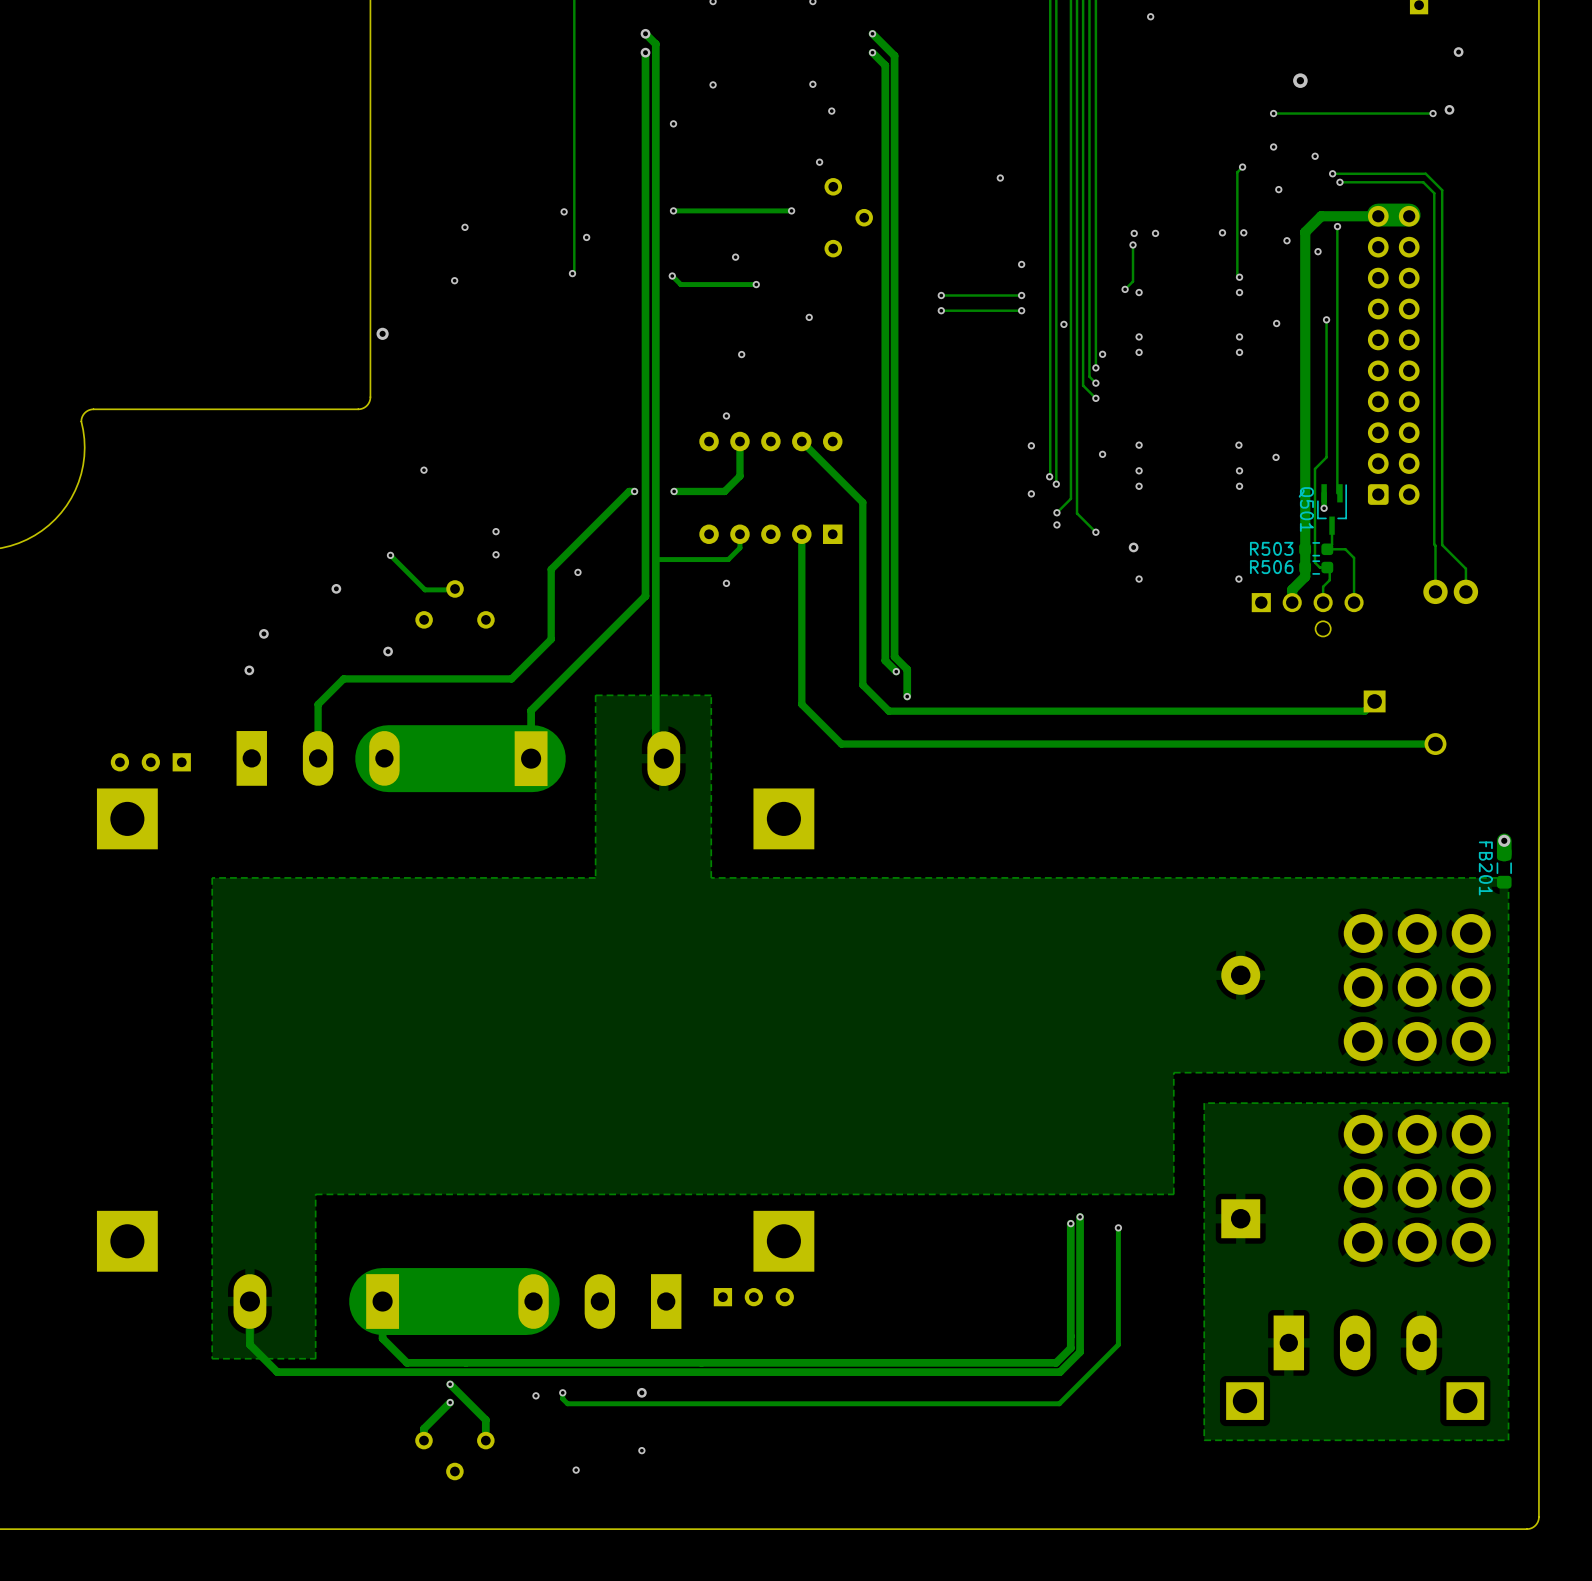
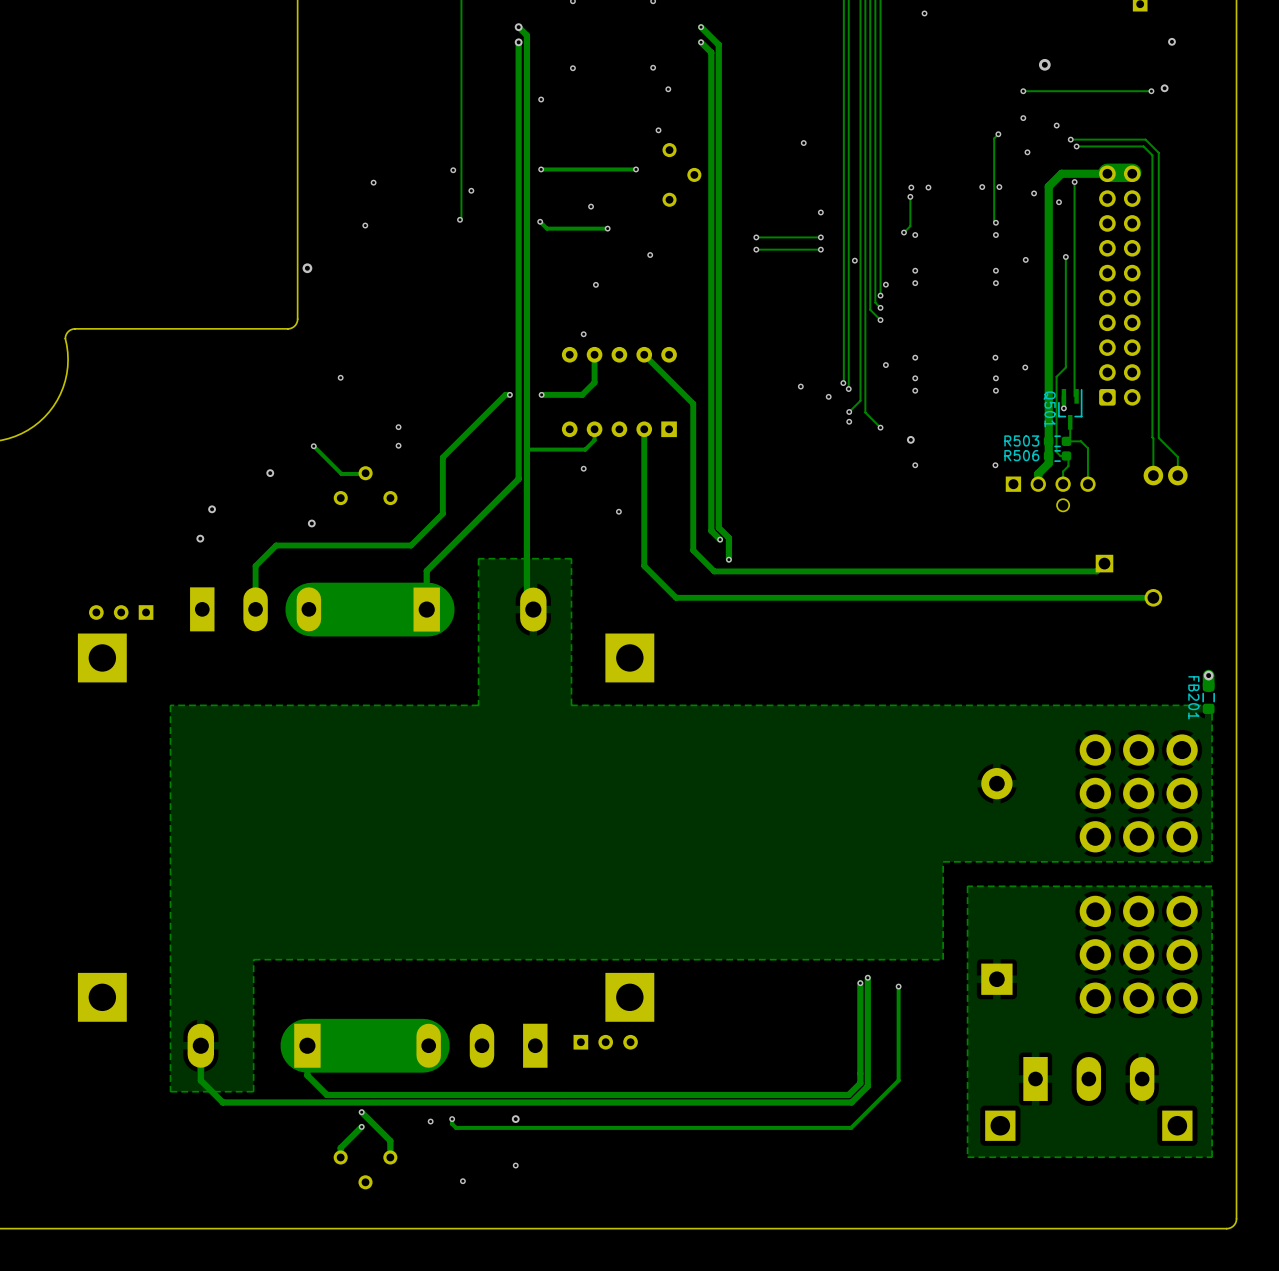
via position: (1031, 445) -> (800, 386)
via: (577, 572) -> none
via: none -> (618, 511)

